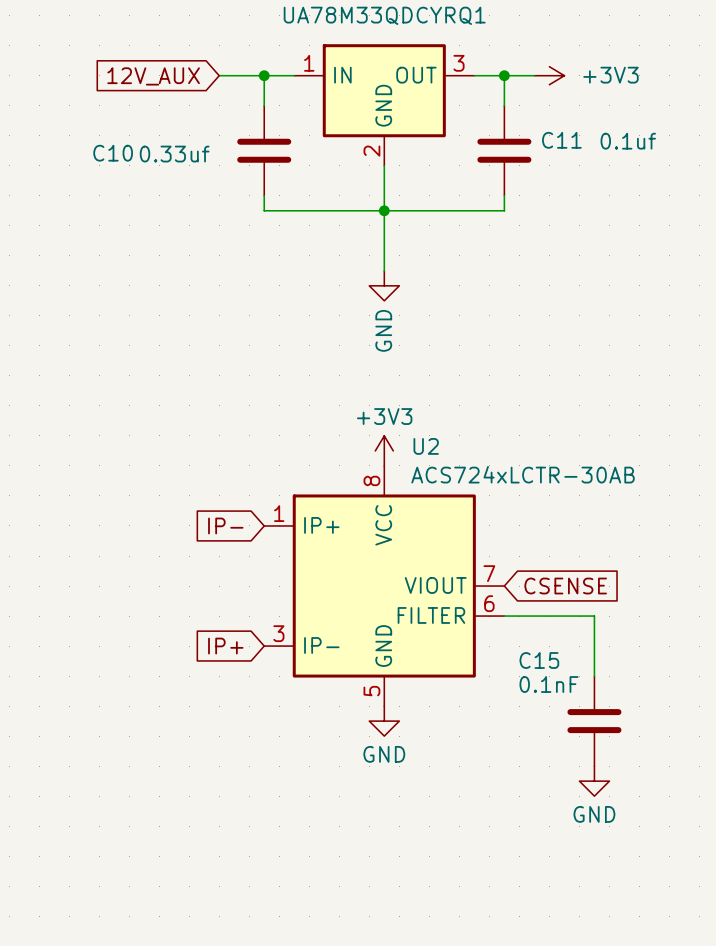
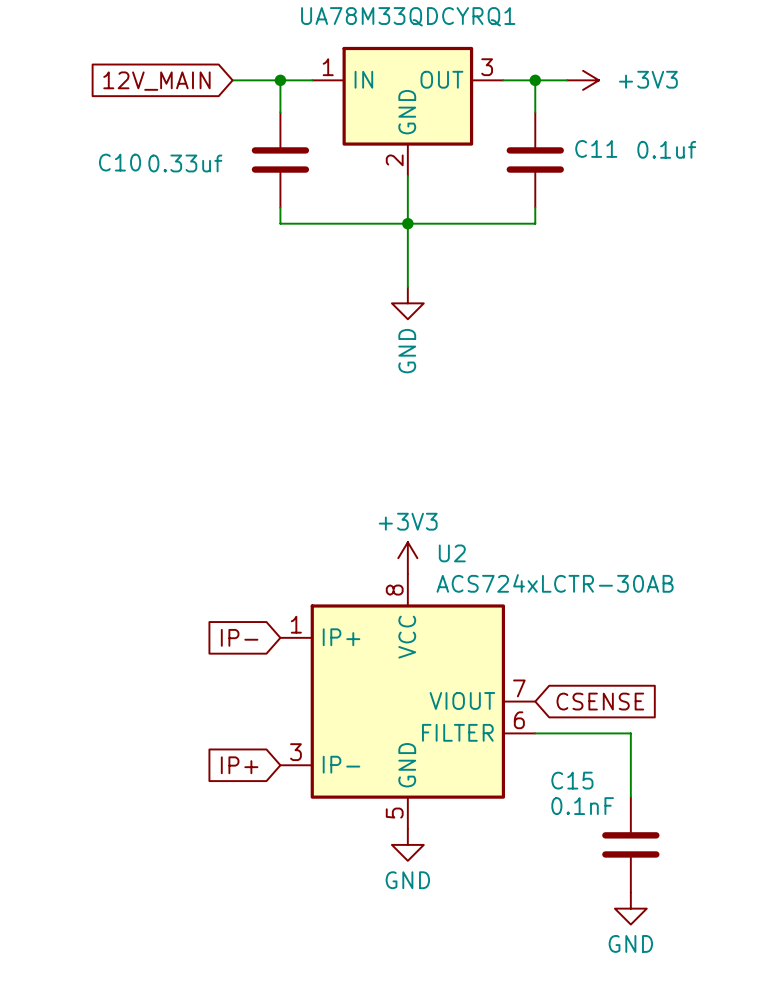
global label: 12V_AUX (153, 76) -> 12V_MAIN (156, 81)
power symbol position: +3V3 (384, 450) -> +3V3 (407, 558)
global label position: IP- (225, 525) -> IP- (239, 637)
U2 position: (384, 586) -> (407, 701)
global label position: CSENSE (565, 586) -> CSENSE (600, 701)
wire: (504, 616) (594, 616) (594, 676) -> (535, 733) (630, 733) (630, 797)
global label position: IP+ (225, 646) -> IP+ (239, 765)
power symbol position: GND (384, 721) -> GND (407, 844)
C15 position: (594, 721) -> (630, 844)
power symbol position: GND (594, 781) -> GND (630, 908)

